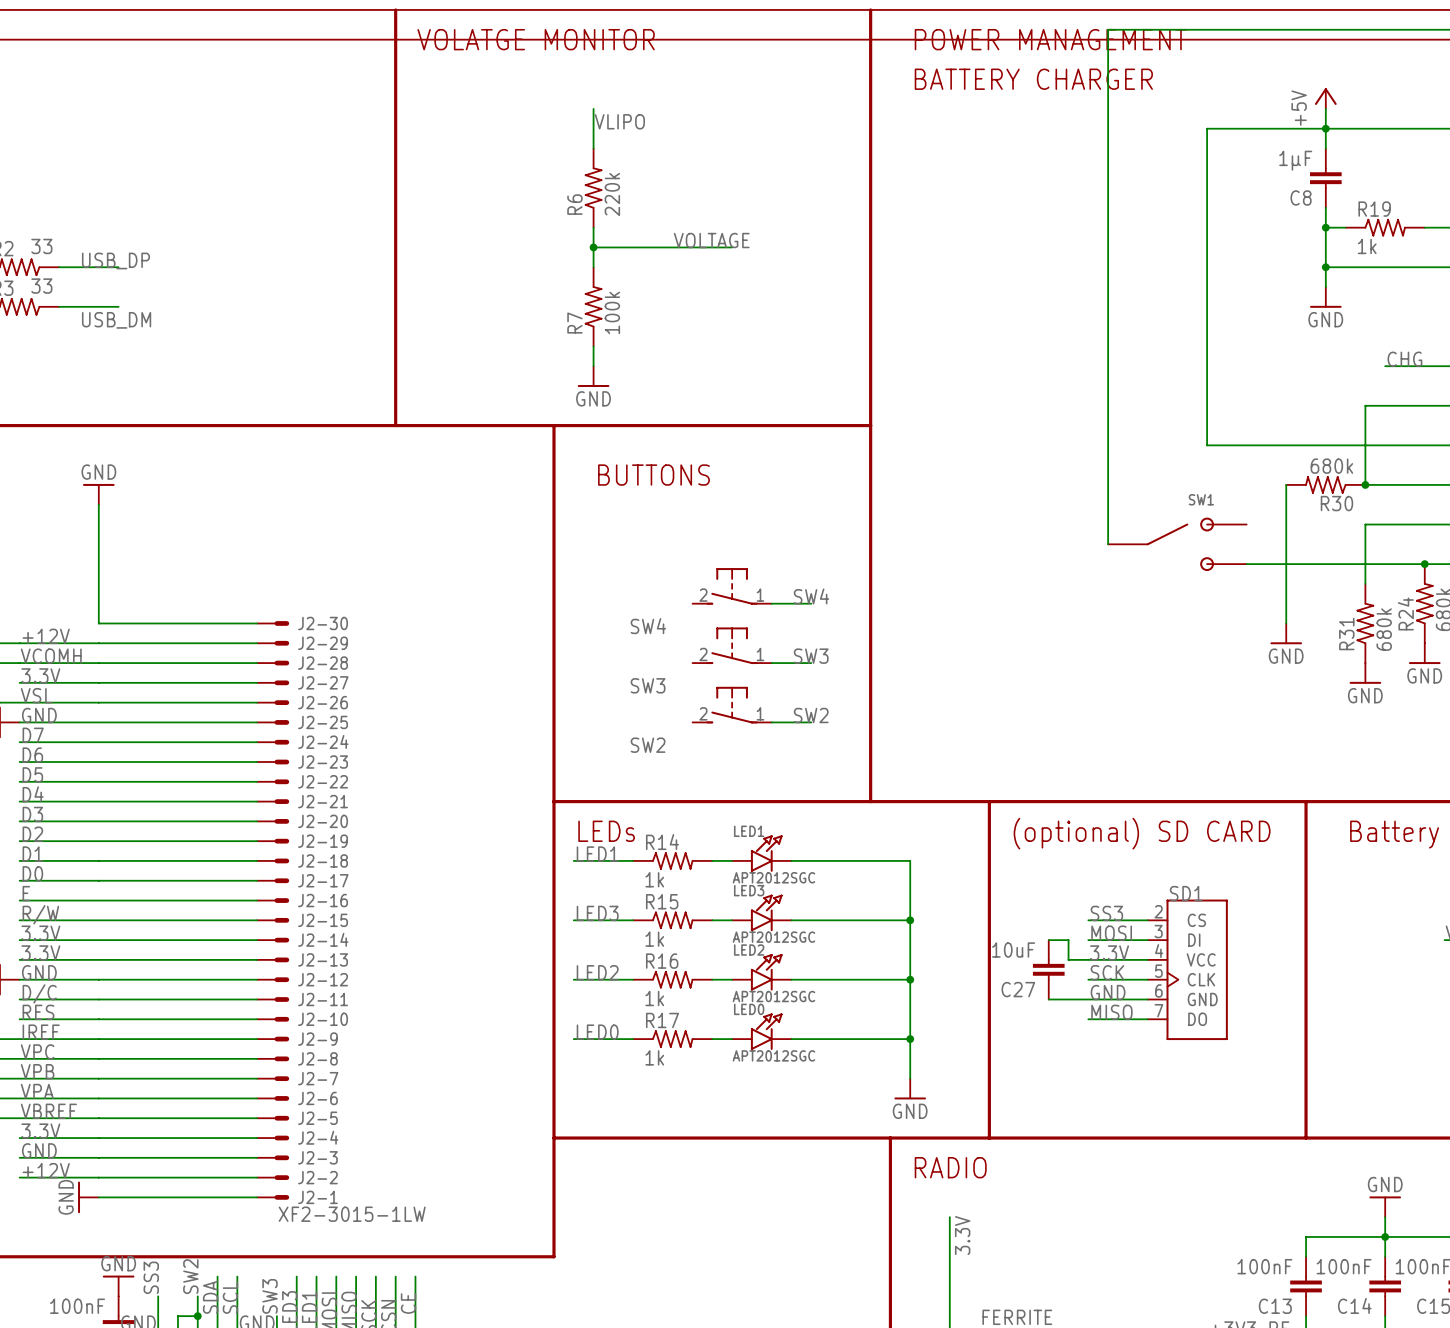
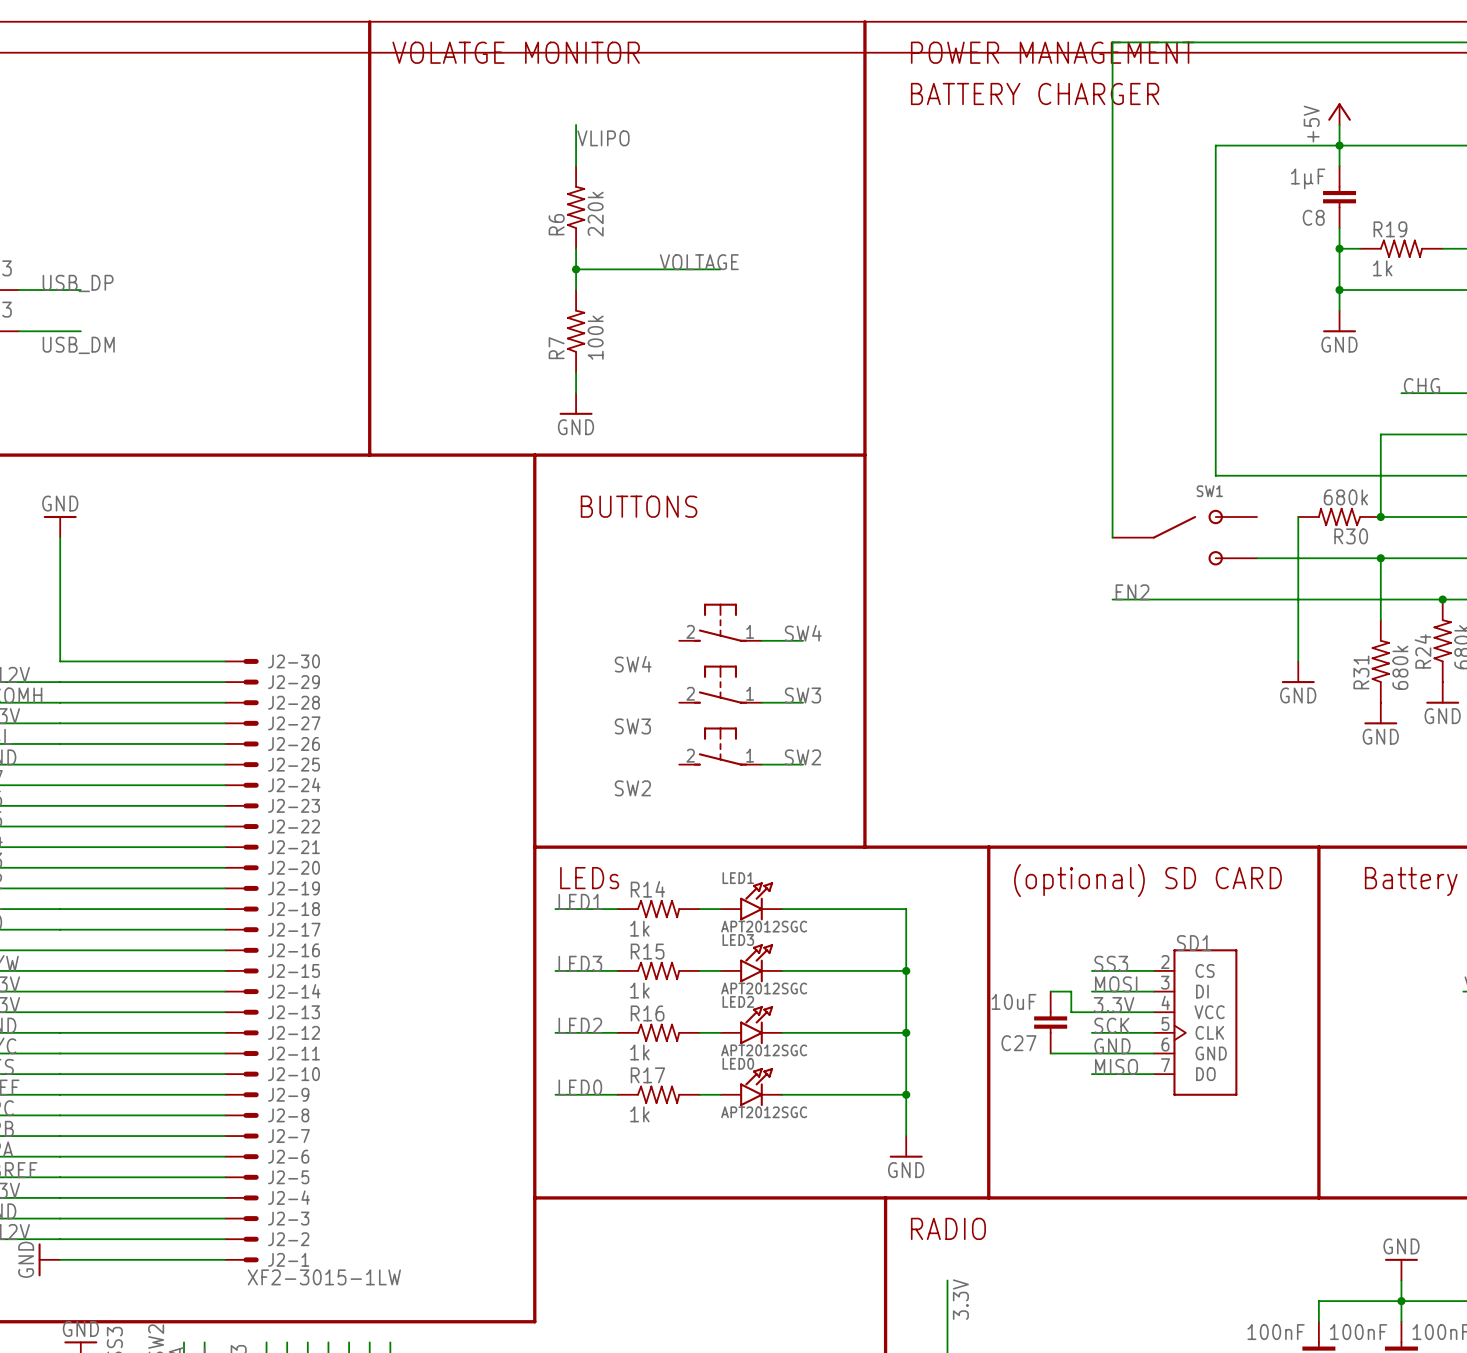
wire: (1108, 504) (1108, 544) -> none
wire: none -> (1257, 558) (1380, 558)
junction: none -> (1380, 558)
SW1 position: (1177, 544) -> (1184, 537)
label: none -> EN2 (1132, 592)
wire: none -> (1112, 599) (1257, 599)

